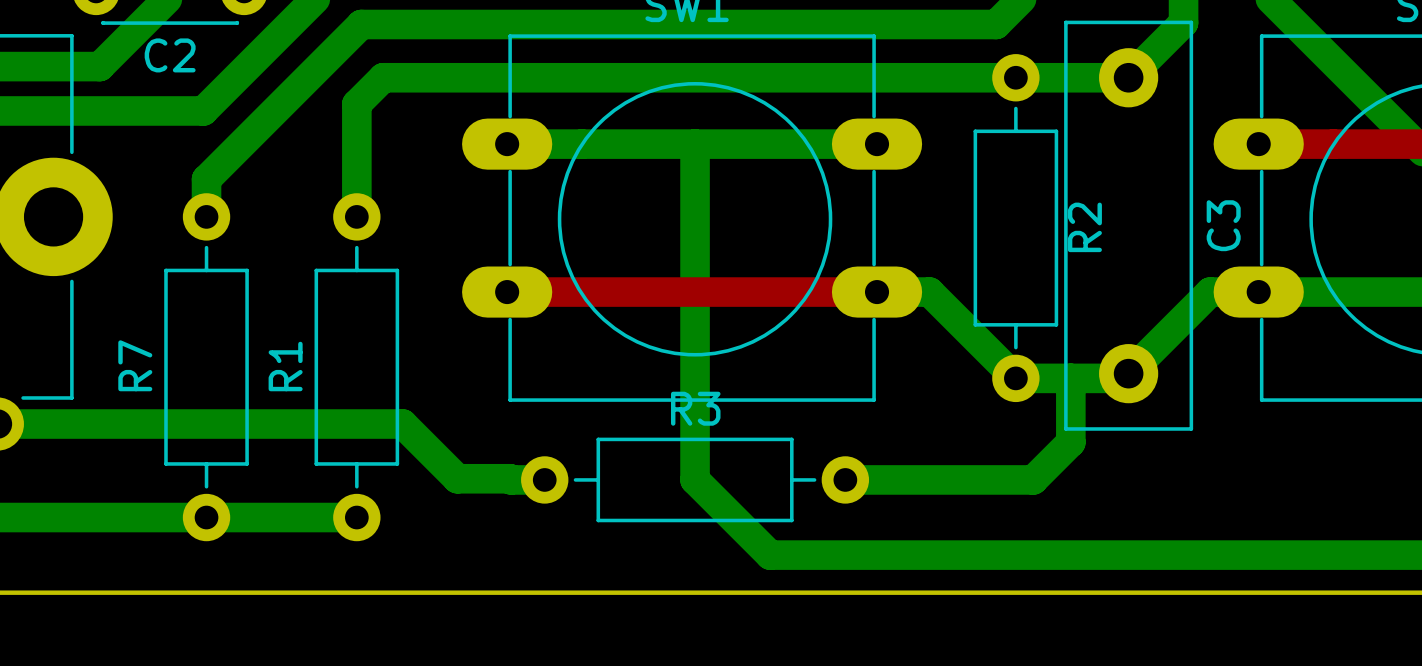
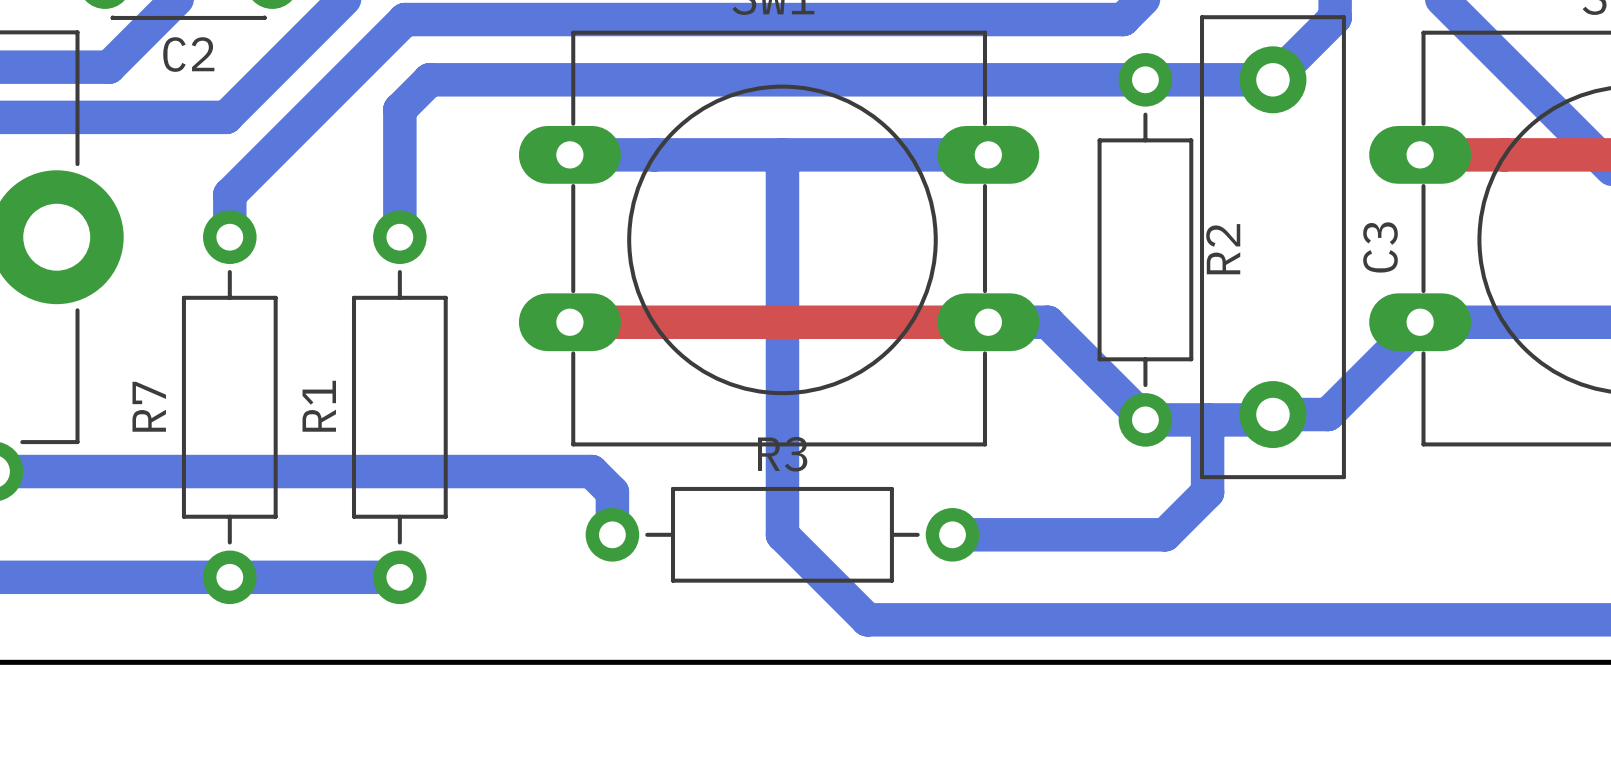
bottom track: (1258, 292) (1210, 292) (1128, 373) -> (1420, 322) (1327, 414) (1272, 414)
bottom track: (402, 424) (457, 478) (544, 479) -> (451, 471) (591, 471) (612, 492) (612, 534)

